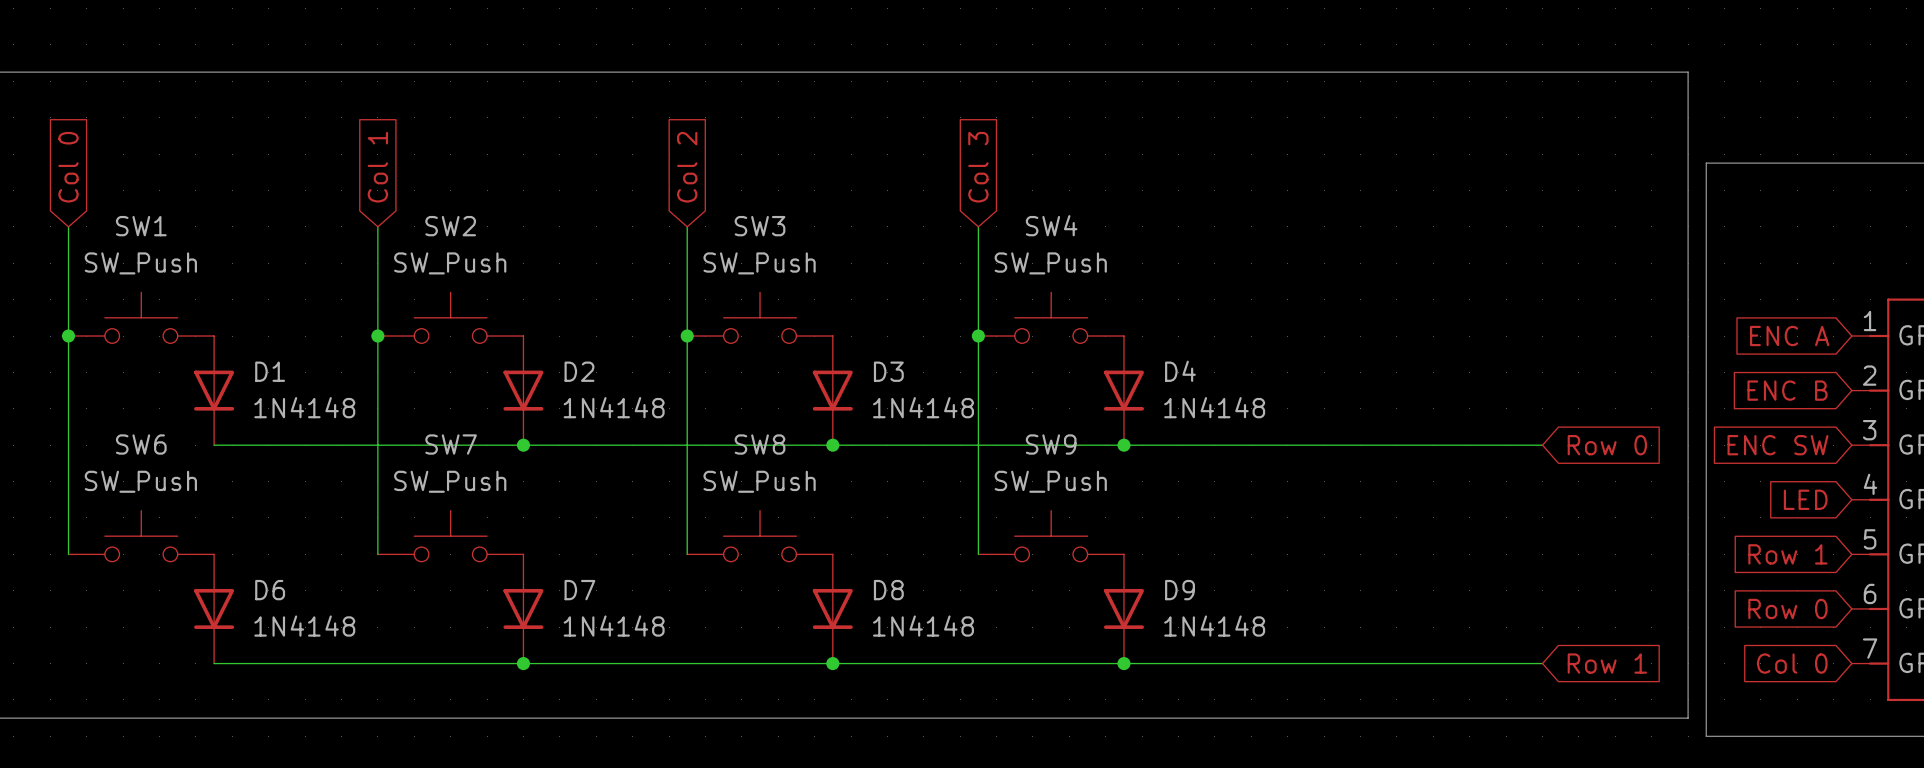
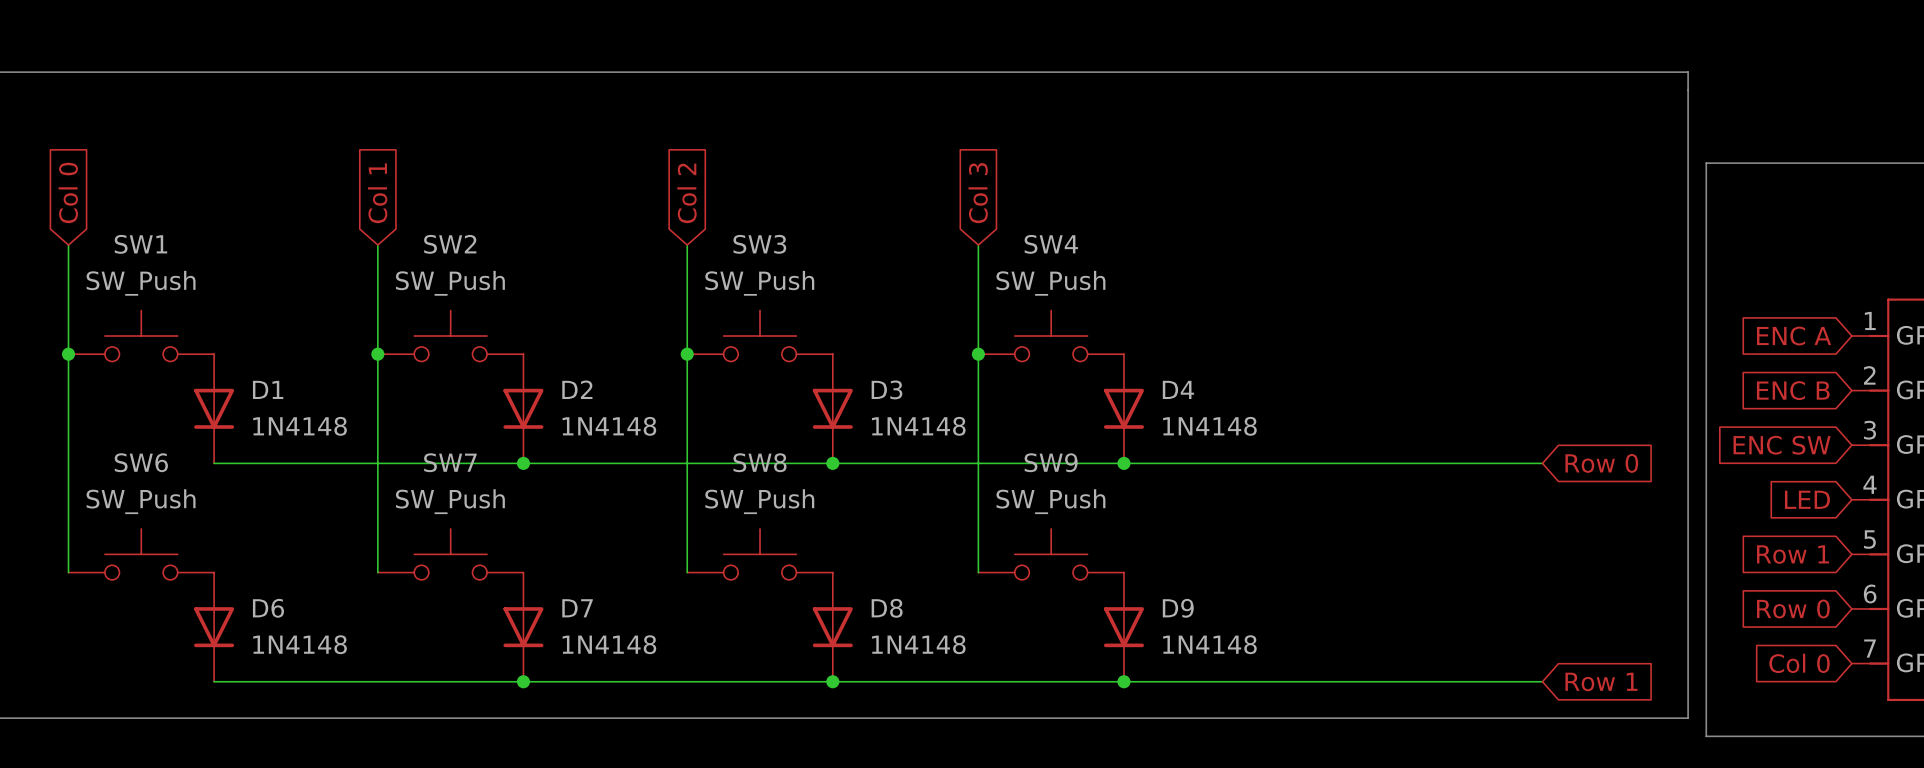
global label position: Col 0 (68, 167) -> Col 0 (68, 192)
global label position: Col 1 (377, 167) -> Col 1 (377, 193)
global label position: Col 2 (687, 167) -> Col 2 (687, 193)
global label position: Col 3 (978, 167) -> Col 3 (978, 193)
wire: (68, 226) (68, 245) -> (68, 554) (68, 572)
wire: (377, 226) (377, 245) -> (377, 554) (377, 572)
wire: (687, 226) (687, 245) -> (687, 554) (687, 572)
wire: (978, 226) (978, 245) -> (978, 554) (978, 572)
SW1 position: (141, 317) -> (141, 336)
SW2 position: (450, 317) -> (450, 336)
SW3 position: (760, 317) -> (760, 336)
SW4 position: (1051, 317) -> (1051, 336)
junction position: (68, 336) -> (68, 354)
junction position: (377, 336) -> (377, 354)
junction position: (687, 336) -> (687, 354)
junction position: (978, 336) -> (978, 354)
D1 position: (214, 390) -> (214, 408)
D2 position: (523, 390) -> (523, 408)
D3 position: (832, 390) -> (832, 408)
D4 position: (1123, 390) -> (1123, 408)
wire: (214, 445) (1542, 445) -> (214, 463) (1542, 463)
junction position: (523, 445) -> (523, 463)
junction position: (832, 445) -> (832, 463)
junction position: (1123, 445) -> (1123, 463)
global label position: Row 0 (1607, 445) -> Row 0 (1601, 463)
SW6 position: (141, 536) -> (141, 554)
SW7 position: (450, 536) -> (450, 554)
SW8 position: (760, 536) -> (760, 554)
SW9 position: (1051, 536) -> (1051, 554)
D6 position: (214, 608) -> (214, 627)
D7 position: (523, 608) -> (523, 627)
D8 position: (832, 608) -> (832, 627)
D9 position: (1123, 608) -> (1123, 627)
wire: (214, 663) (1542, 663) -> (214, 681) (1542, 681)
junction position: (523, 663) -> (523, 681)
junction position: (832, 663) -> (832, 681)
junction position: (1123, 663) -> (1123, 681)
global label position: Row 1 (1607, 663) -> Row 1 (1601, 681)

